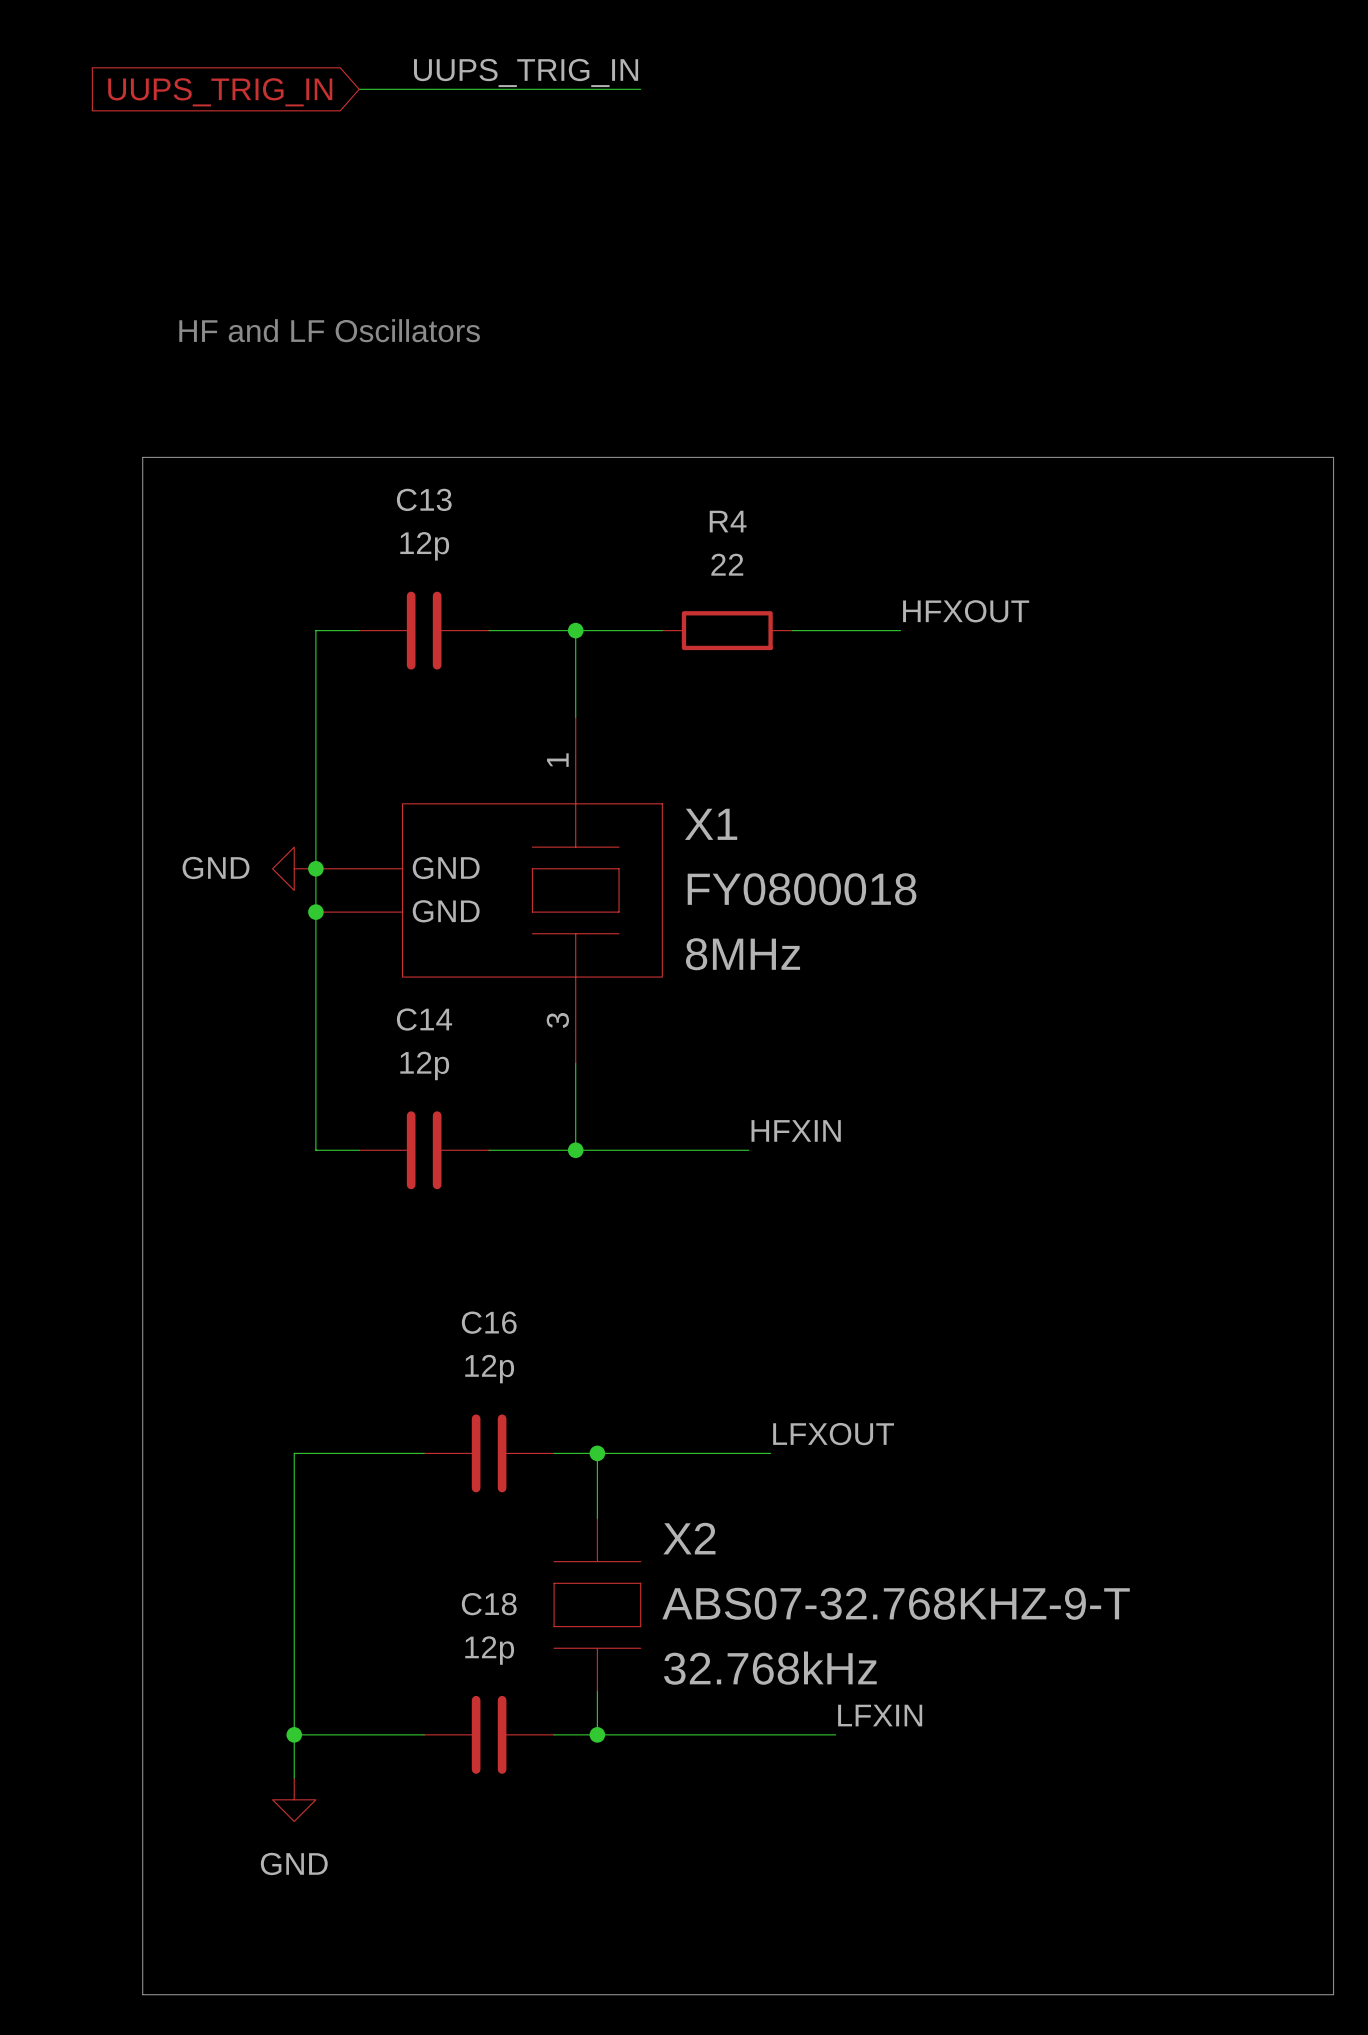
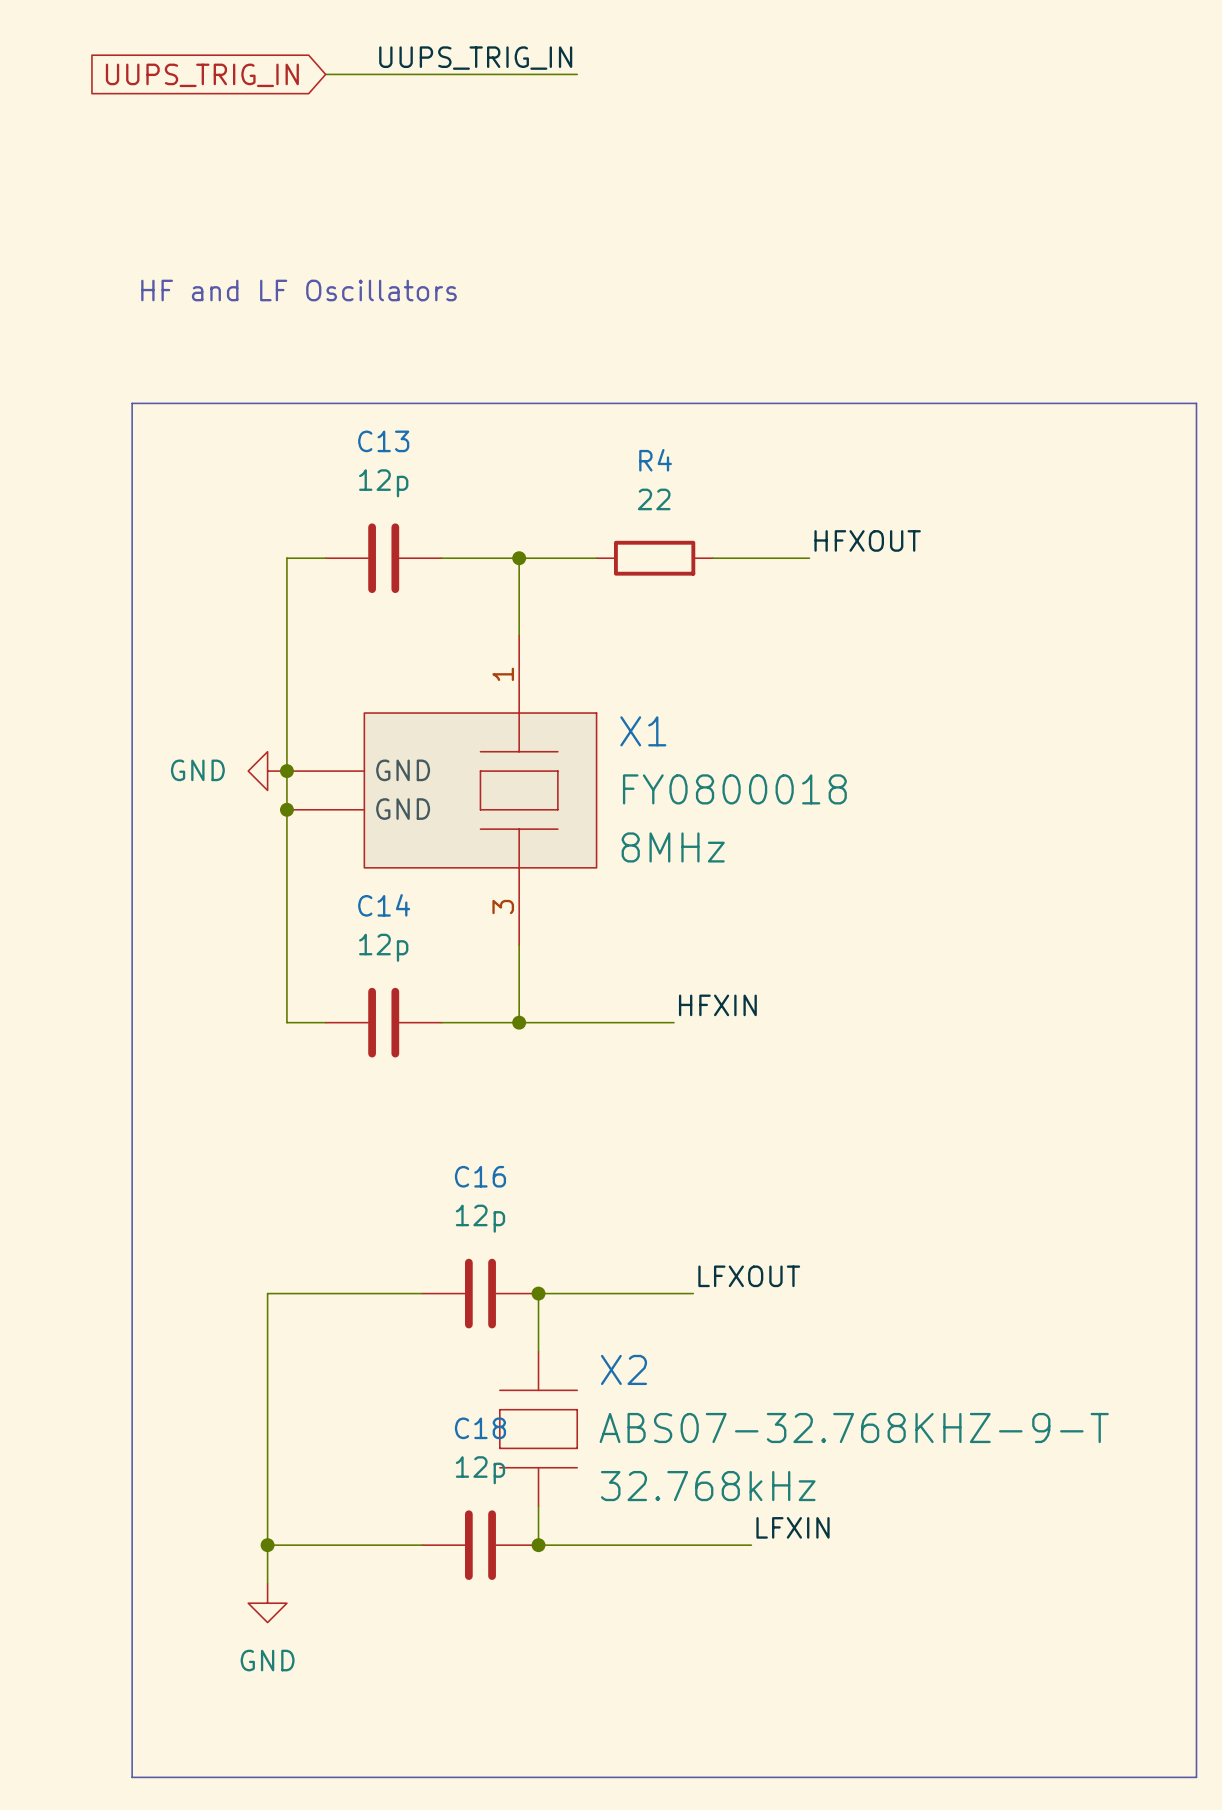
C16 position: (489, 1453) -> (480, 1293)
C18 position: (489, 1734) -> (480, 1545)

